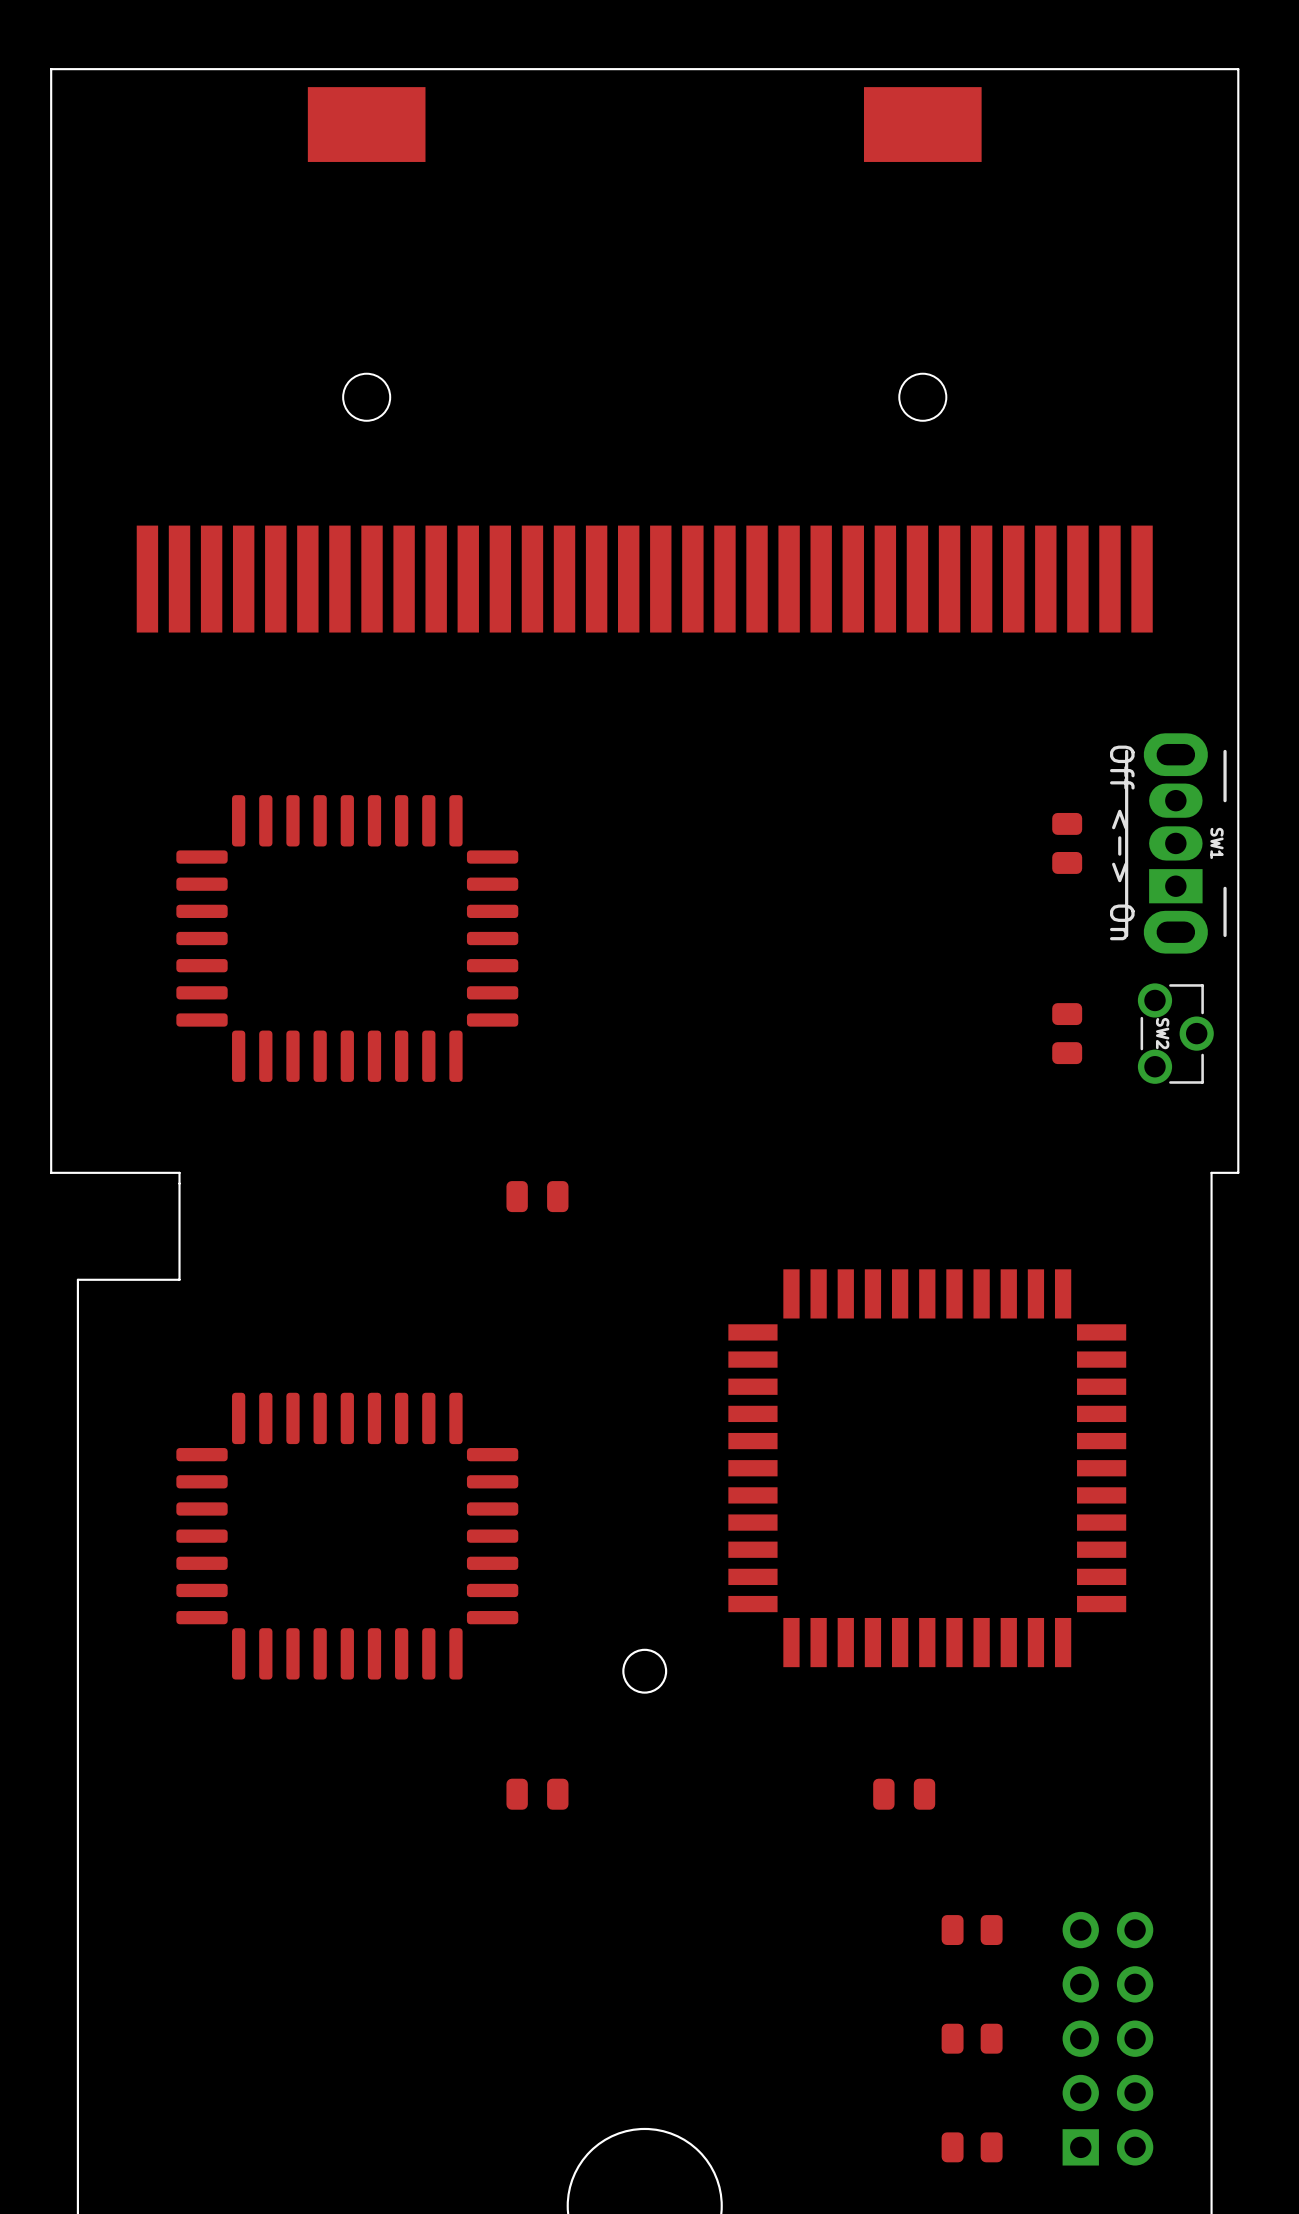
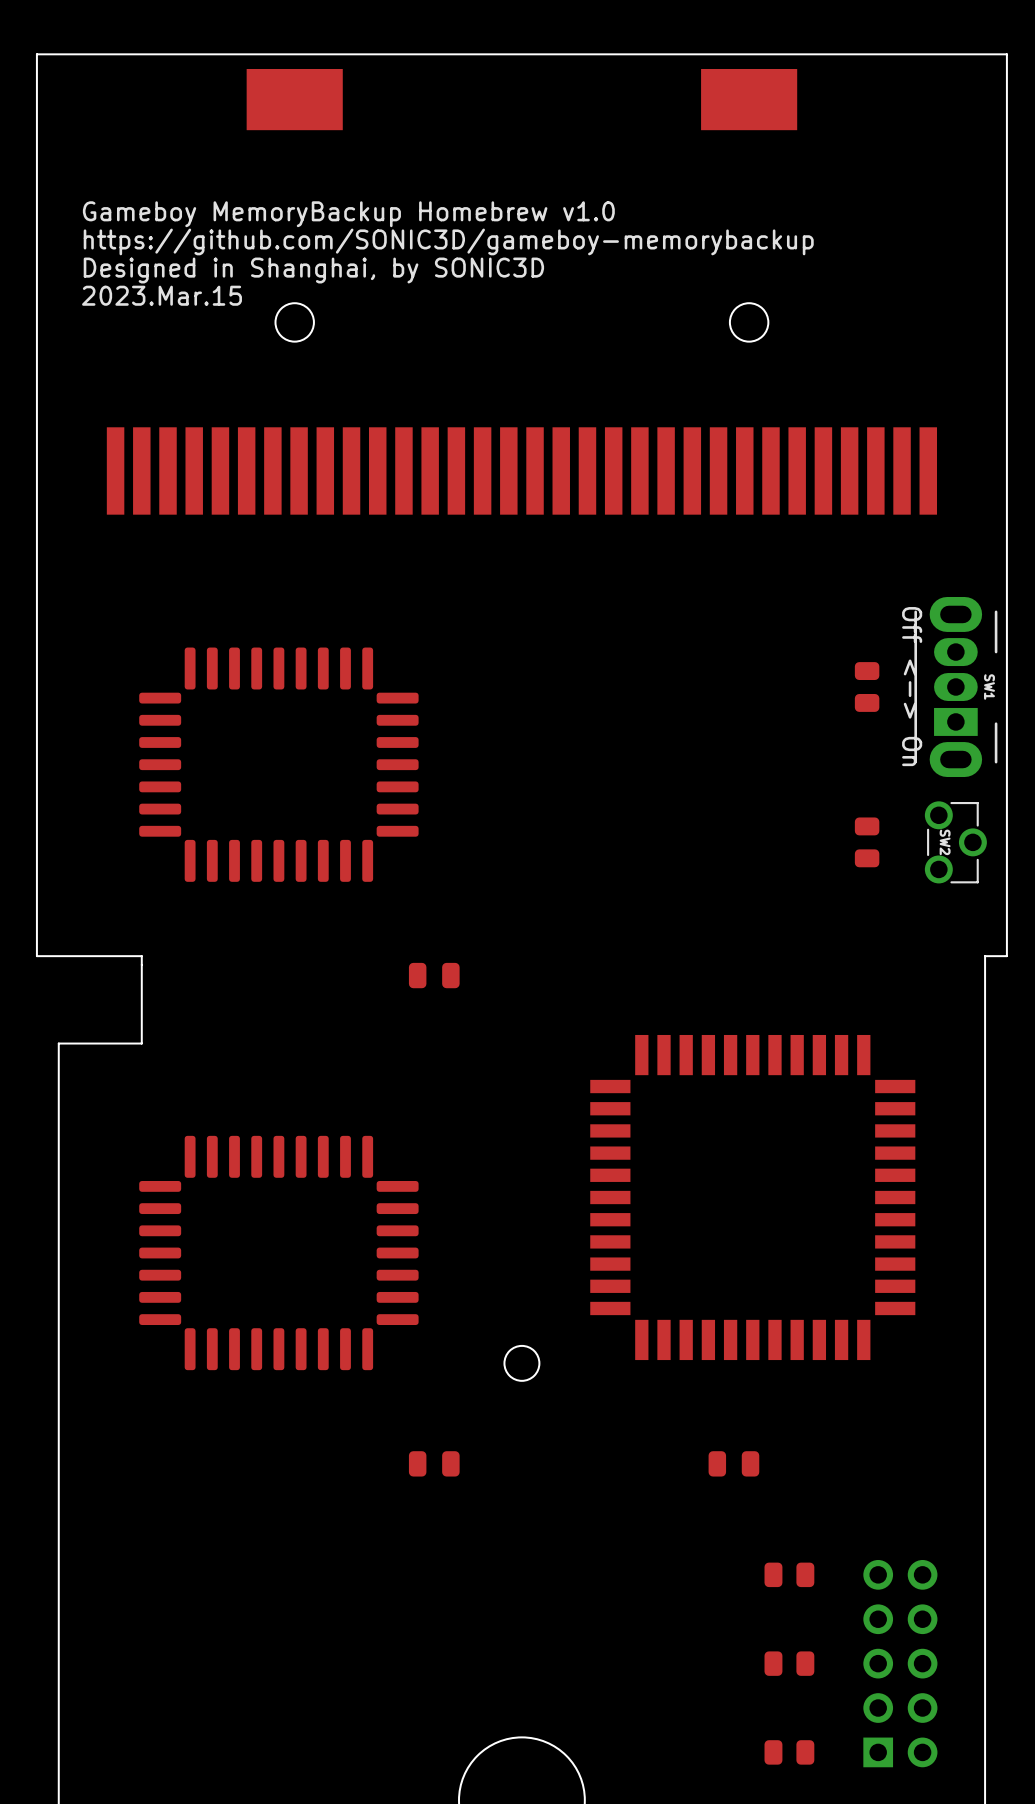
text: none -> Gameboy MemoryBackup Homebrew v1.0 (348, 214)
text: none -> https://github.com/SONIC3D/gameboy-memorybackup (448, 241)
text: none -> Designed in Shanghai, by SONIC3D (313, 270)
text: none -> 2023.Mar.15 (162, 295)

